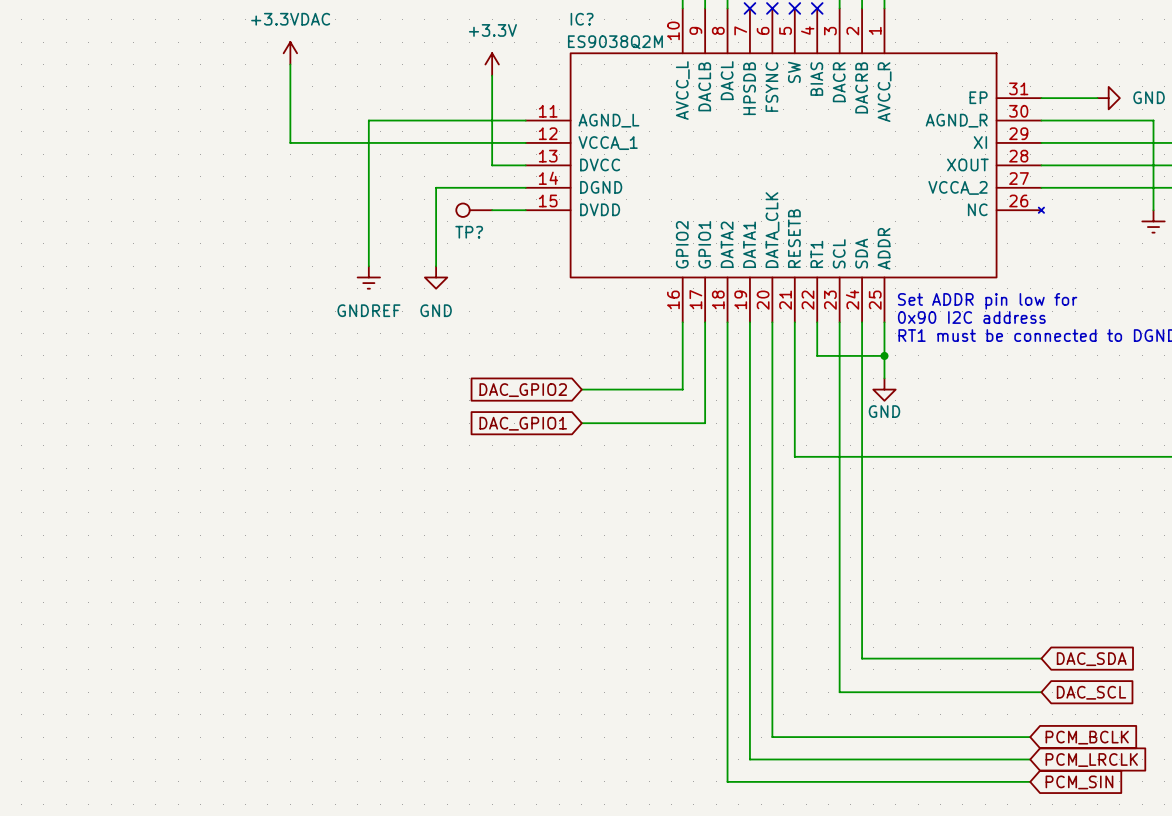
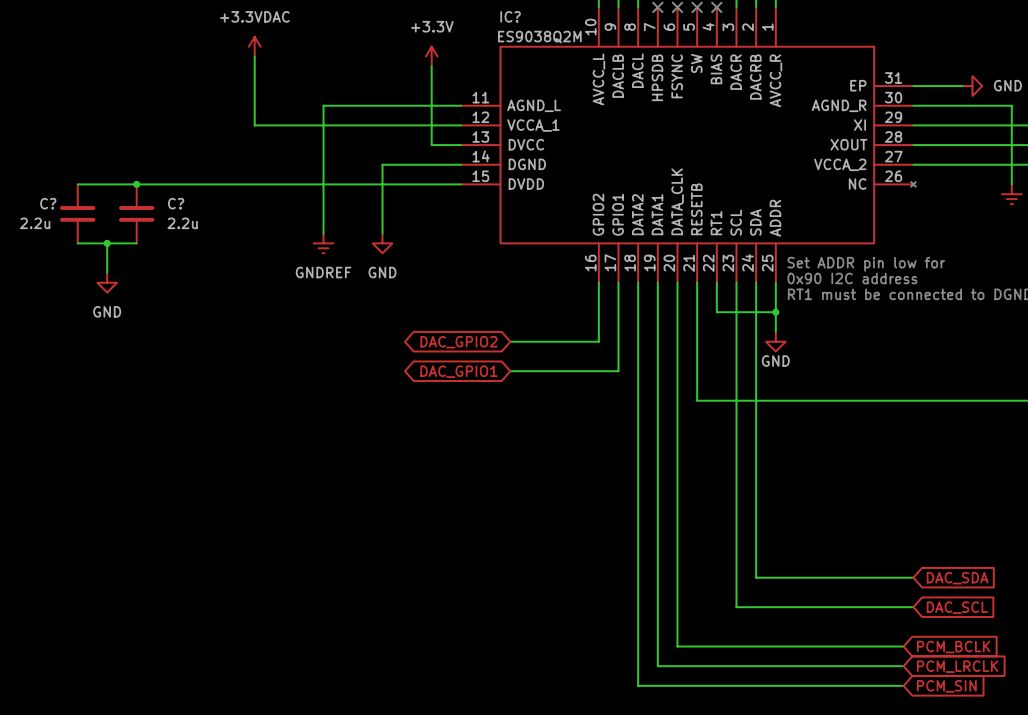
wire: none -> (77, 184) (431, 184)
junction: none -> (136, 184)
TP?: (474, 210) -> none
C?: none -> 2.2u (77, 213)
C?: none -> 2.2u (136, 213)
wire: none -> (77, 243) (136, 243)
wire: none -> (107, 243) (107, 272)
junction: none -> (107, 243)
power symbol: none -> GND (107, 282)
global label shape: input (523, 390) -> bidirectional (458, 342)
global label shape: input (523, 423) -> bidirectional (458, 371)

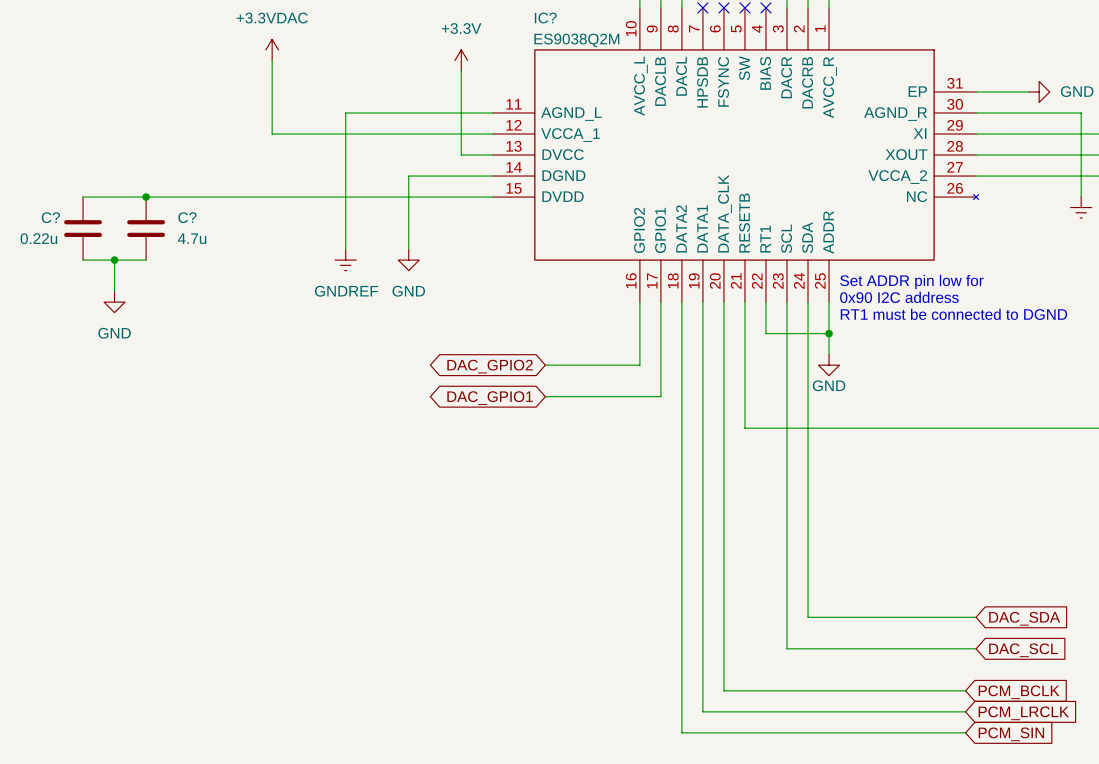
C? value: 2.2u (35, 223) -> 0.22u (38, 238)
C? value: 2.2u (182, 223) -> 4.7u (192, 238)

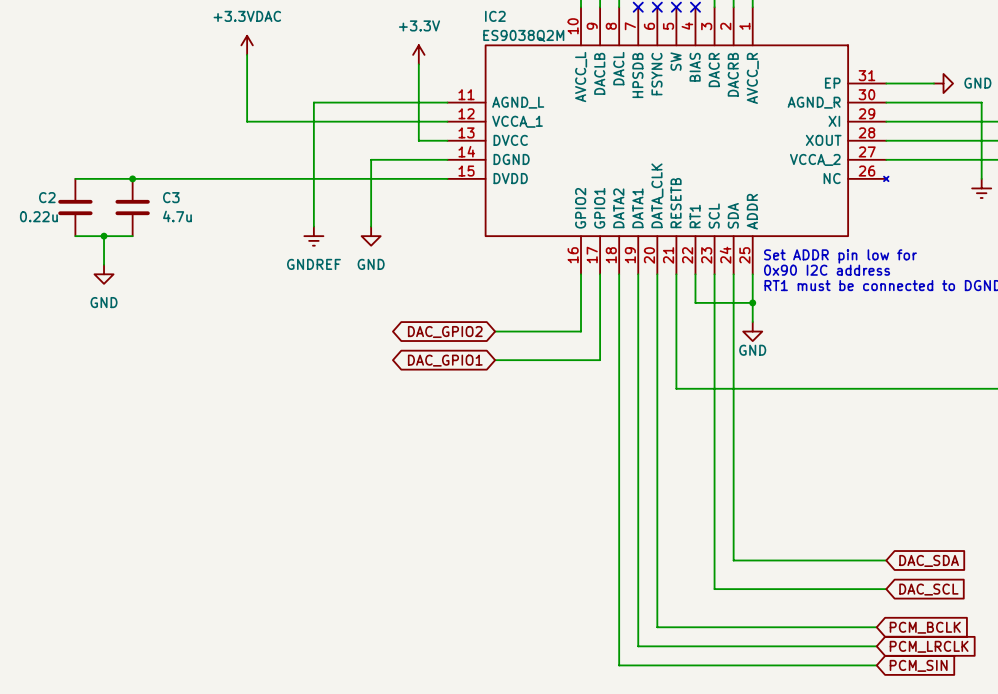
IC? name: IC? (545, 18) -> IC2 (495, 16)
C? name: C? (50, 217) -> C2 (47, 197)
C? name: C? (187, 217) -> C3 (171, 197)

